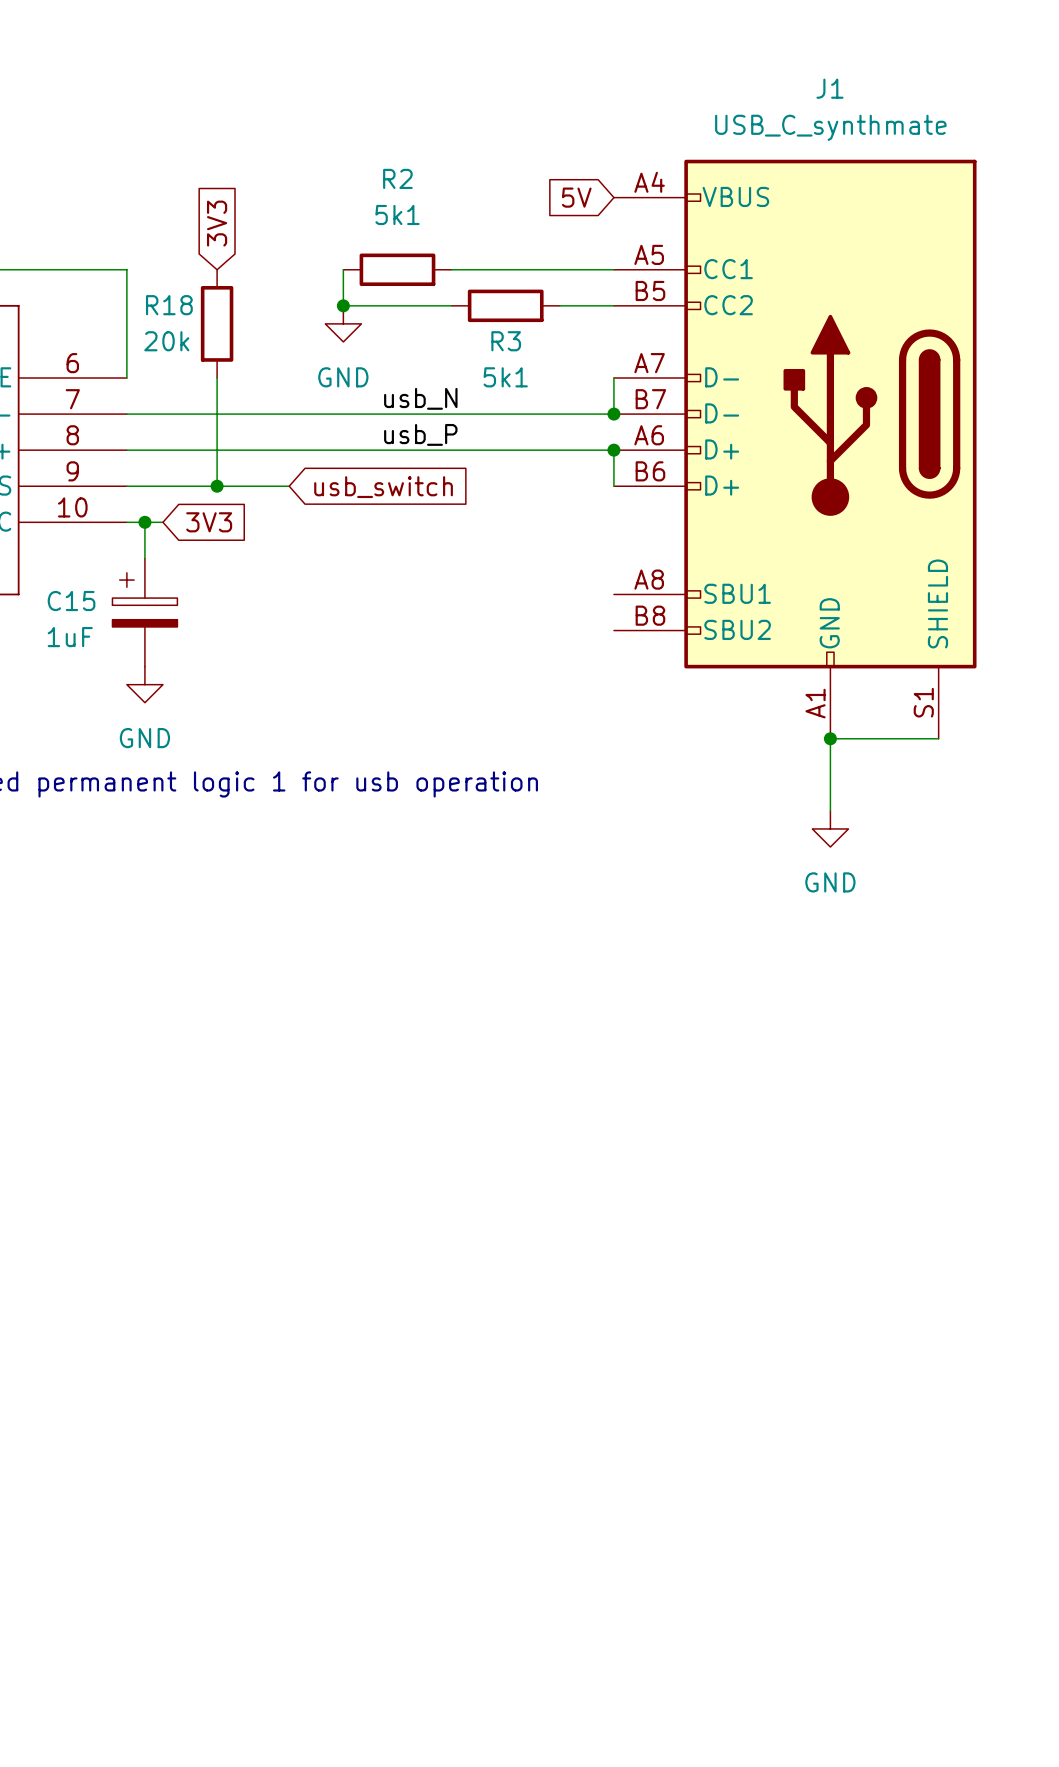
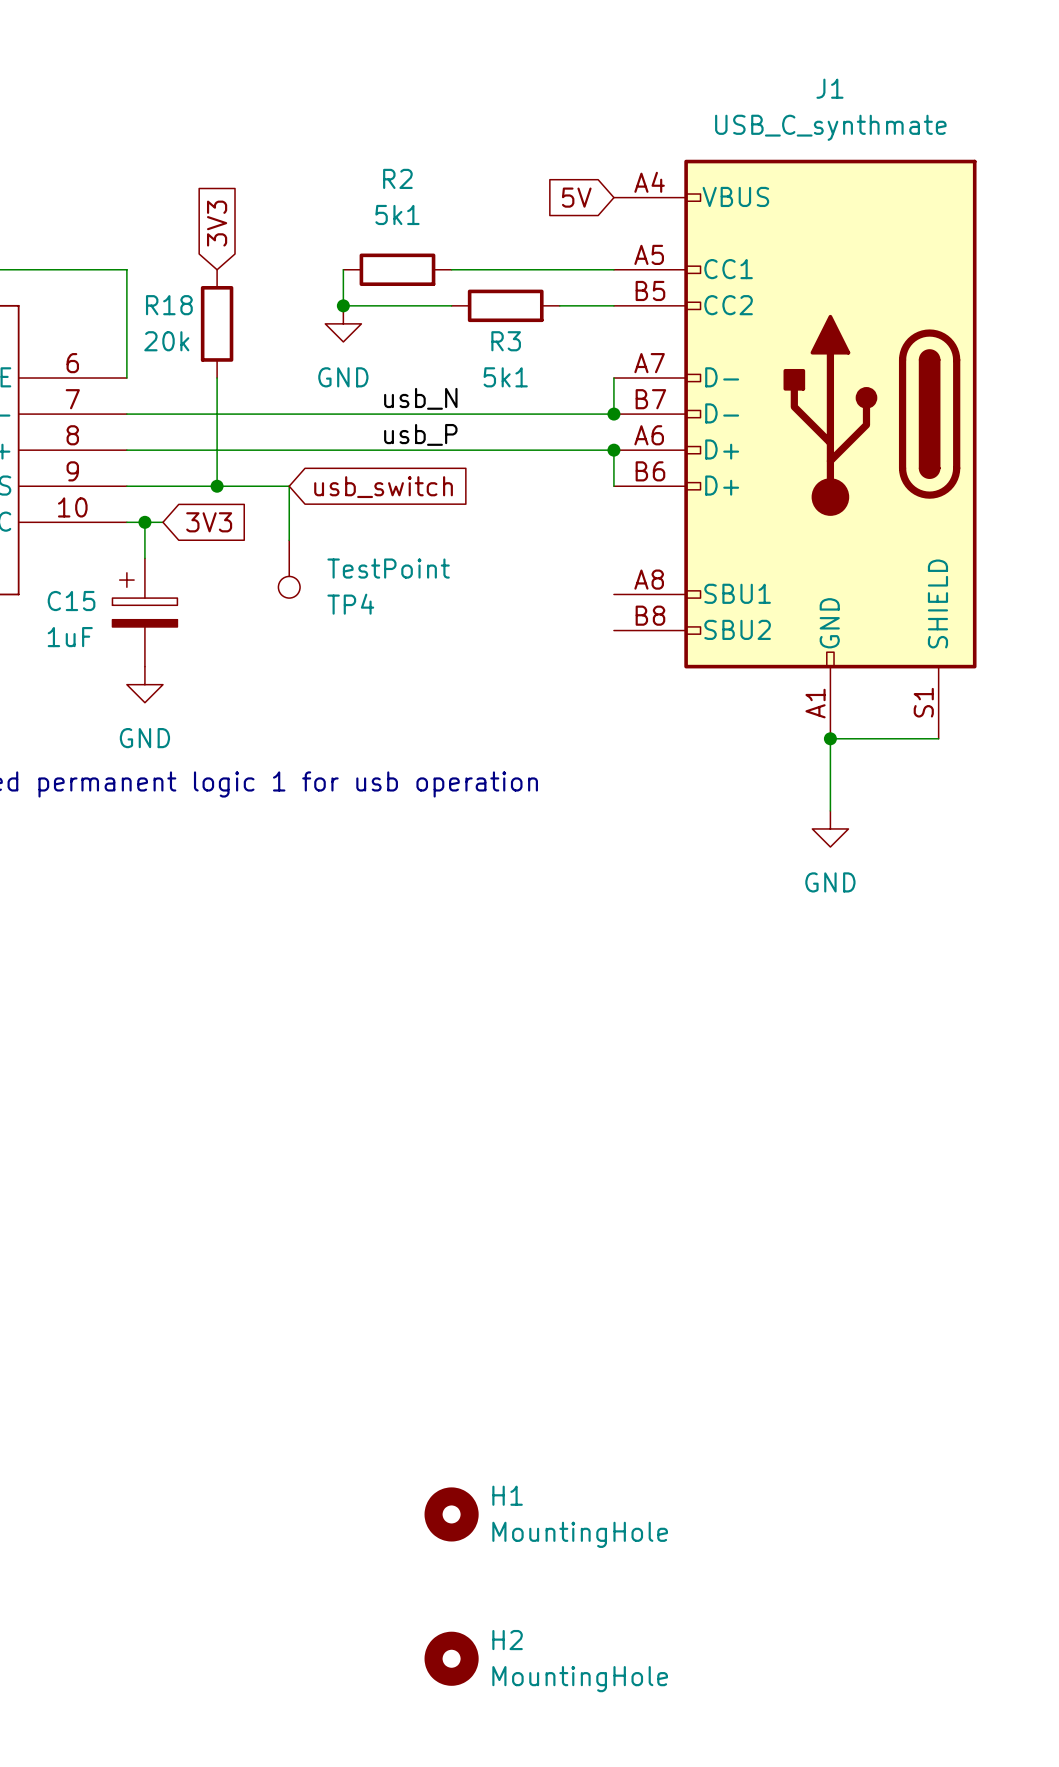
wire: none -> (289, 486) (289, 540)
TP4: none -> TestPoint (289, 569)
H1: none -> MountingHole (451, 1514)
H2: none -> MountingHole (451, 1658)

